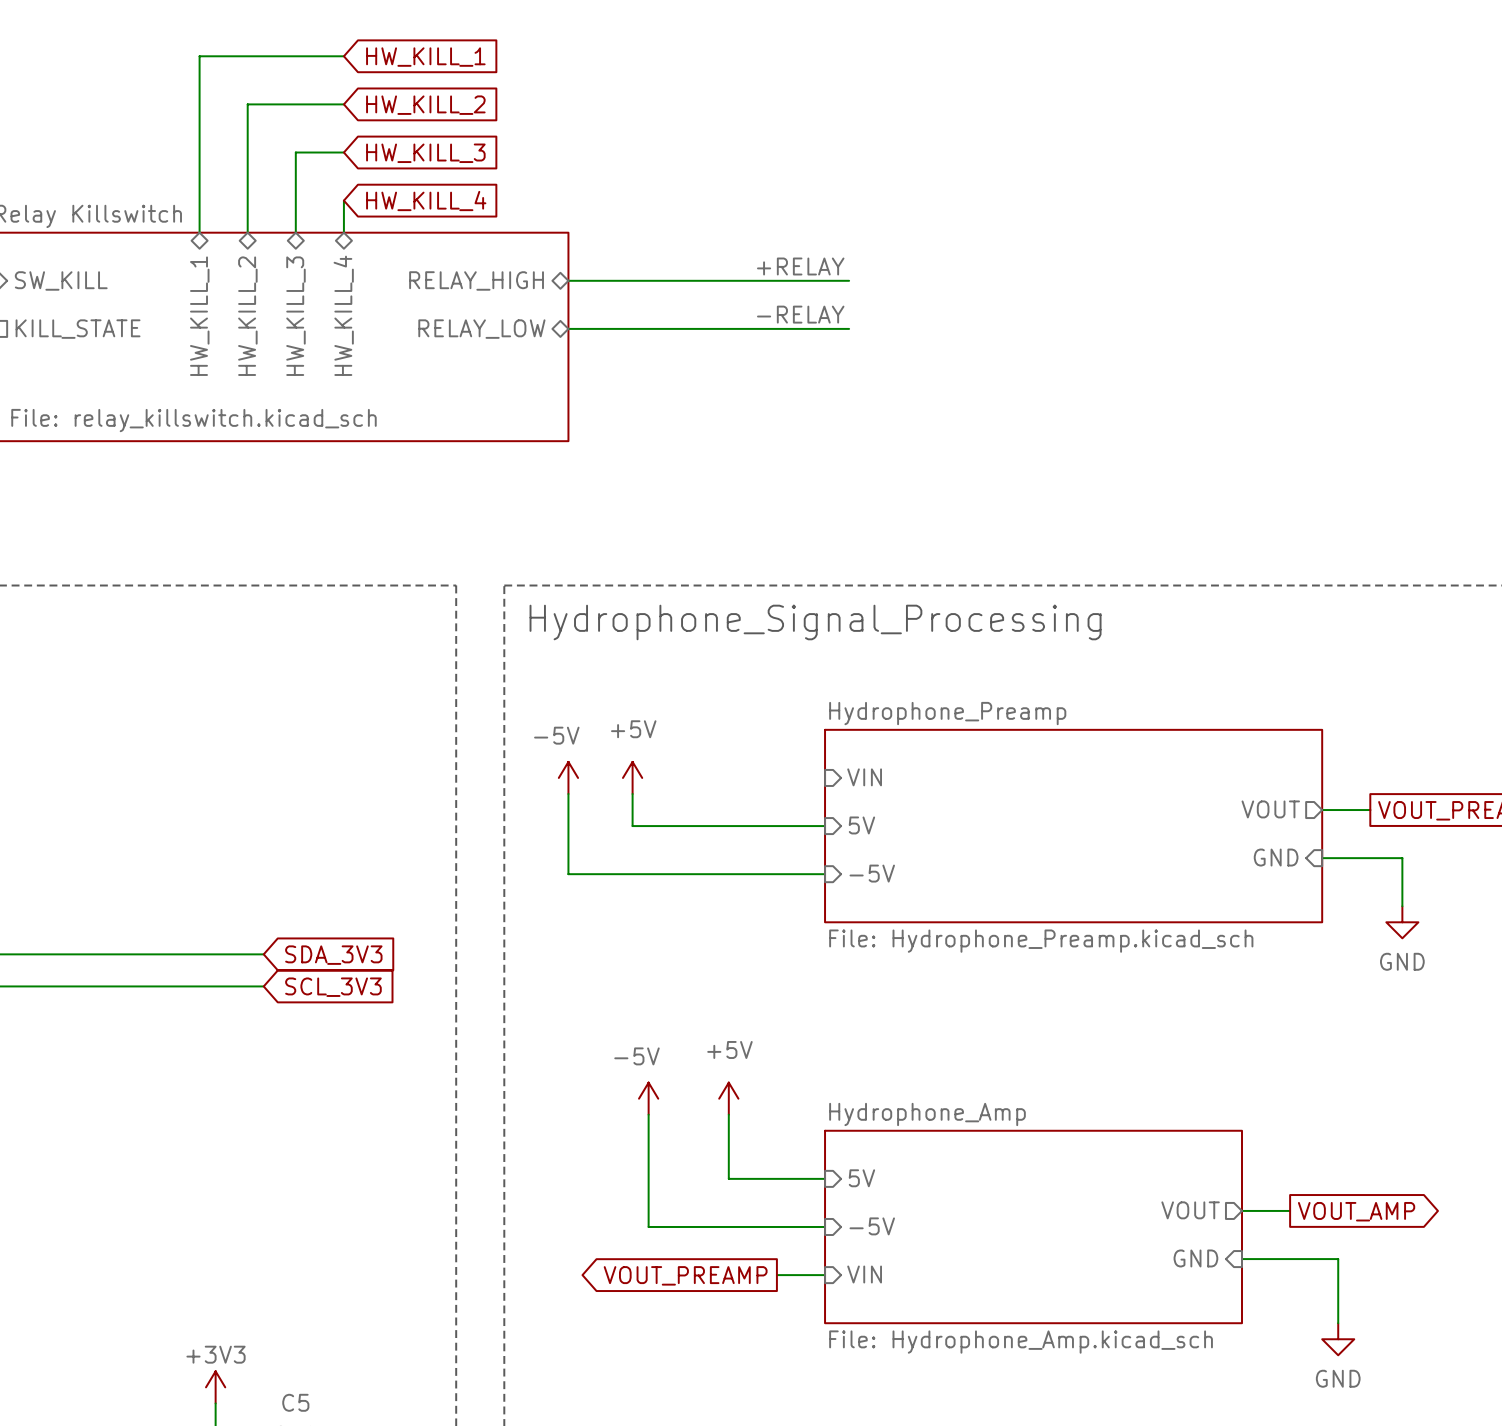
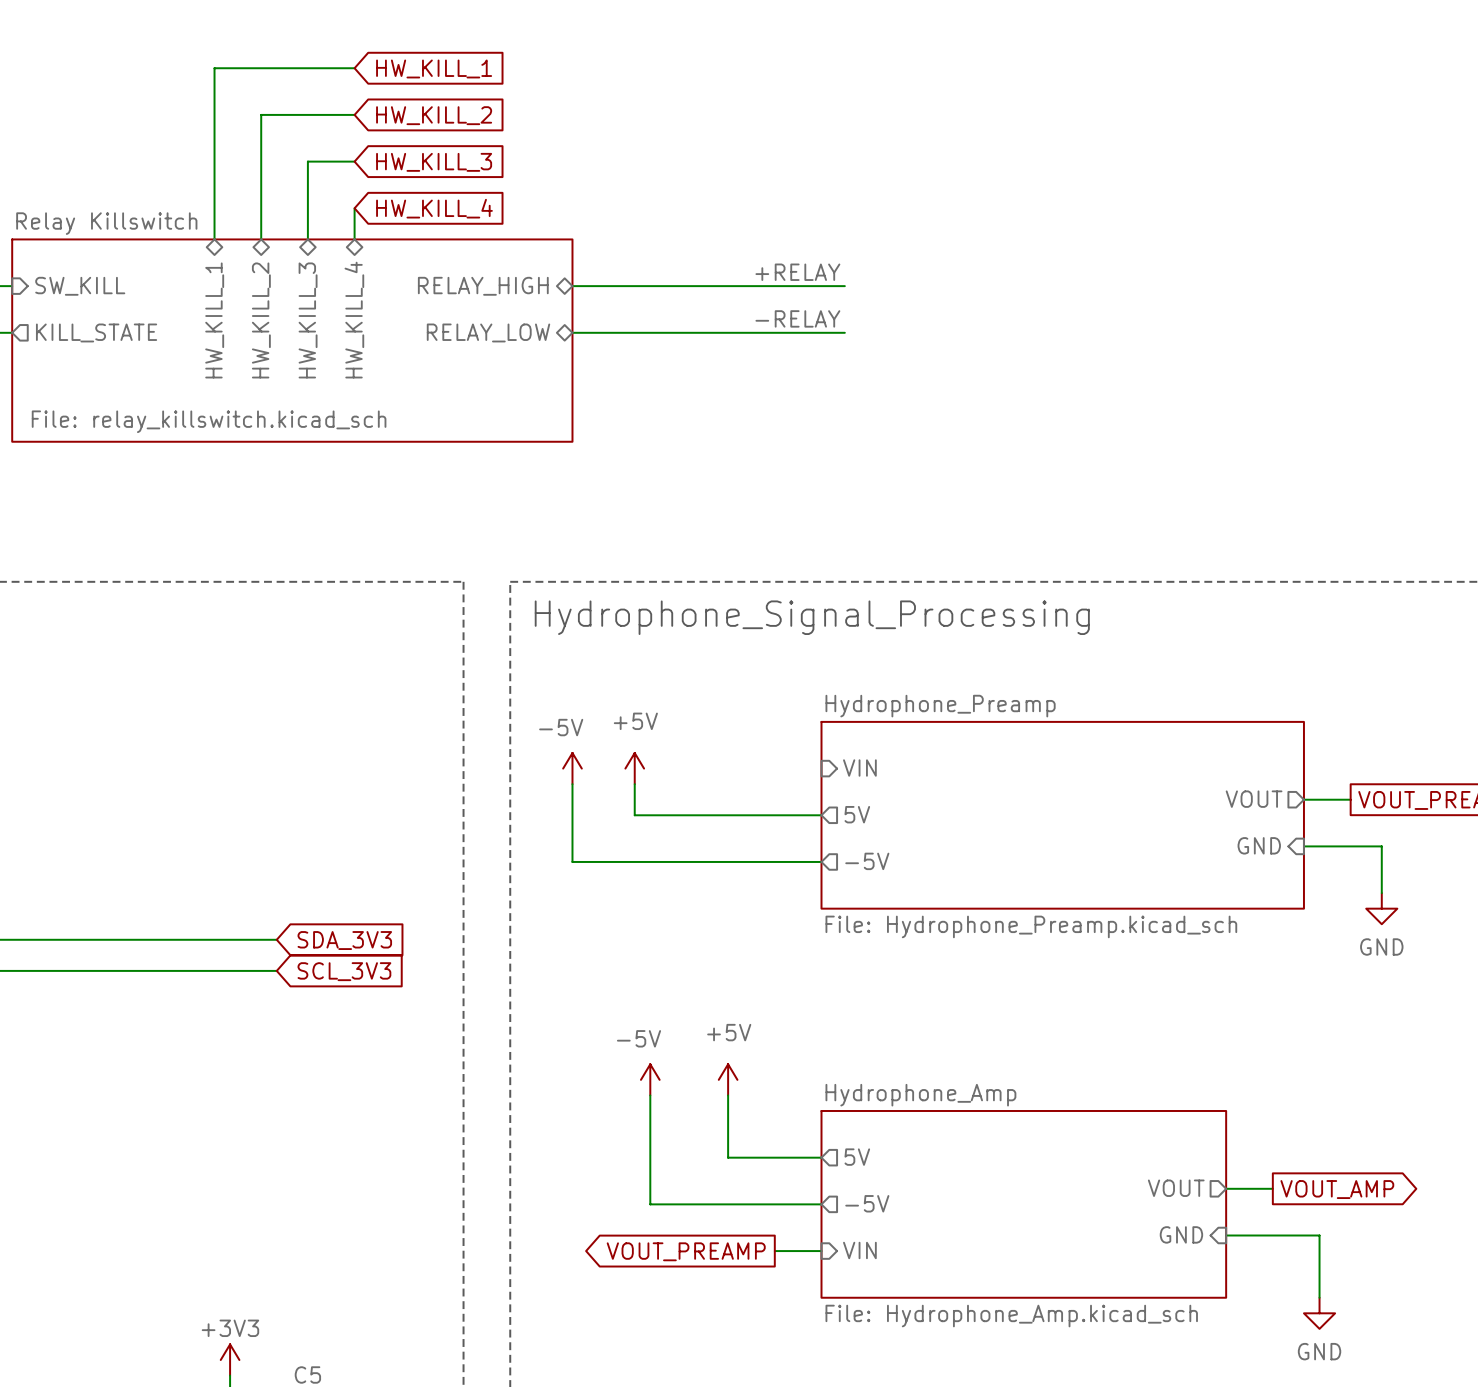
sheet pin shape: input (861, 825) -> output (857, 814)
sheet pin shape: input (872, 873) -> output (867, 861)
sheet pin shape: input (861, 1178) -> output (857, 1157)
sheet pin shape: input (872, 1226) -> output (867, 1203)

